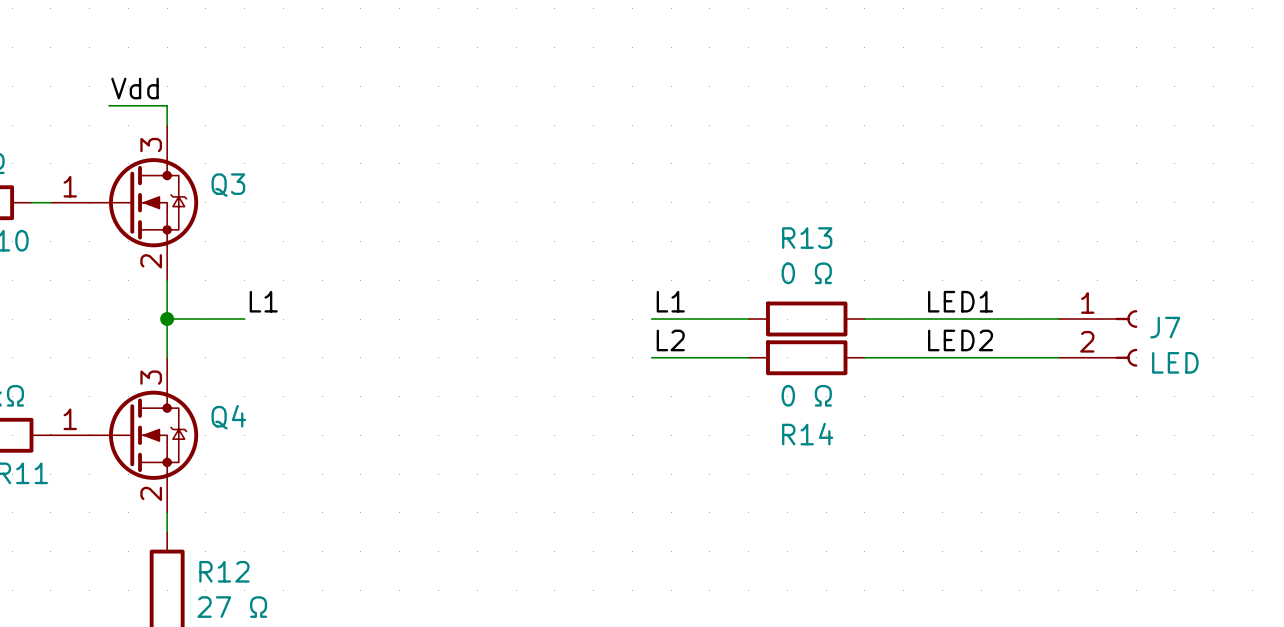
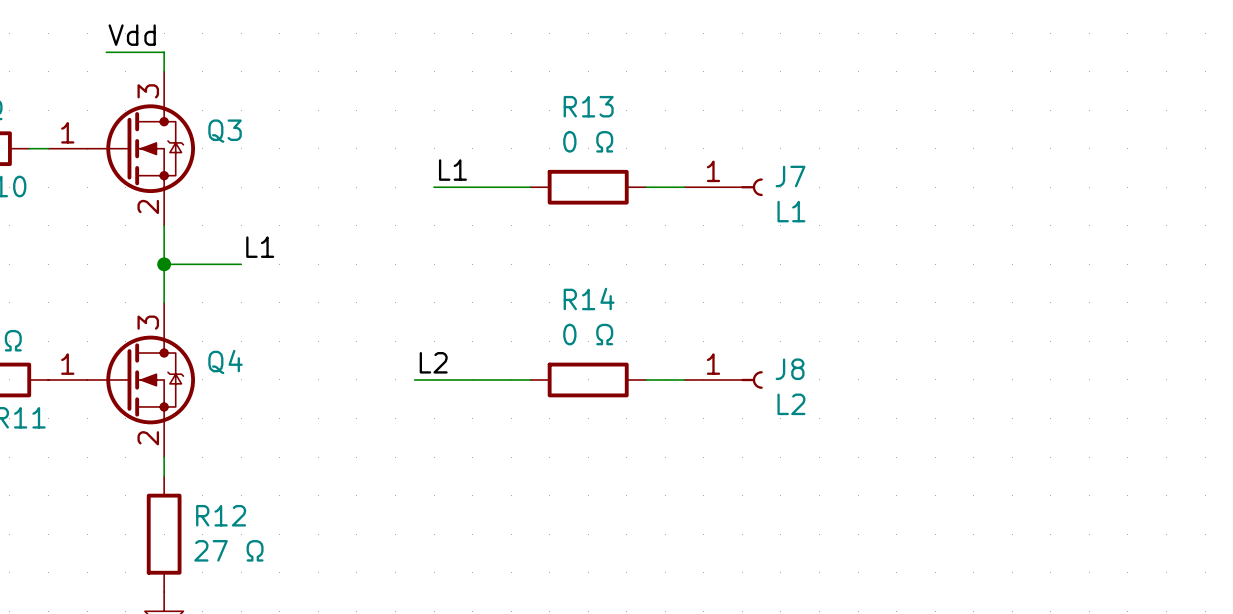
wire: none -> (646, 187) (684, 187)
label position: L1 (670, 301) -> L1 (452, 170)
label: LED1 (960, 301) -> none
J7 symbol: [1058, 310, 1138, 367] -> [684, 178, 763, 197]
wire: (651, 319) (748, 319) -> (434, 187) (530, 187)
R13 position: (806, 319) -> (588, 187)
wire: (864, 319) (1058, 319) -> none
label position: L2 (670, 340) -> L2 (433, 362)
label: LED2 (960, 340) -> none
wire: (651, 357) (748, 357) -> none
R14 position: (806, 357) -> (588, 379)
wire: (864, 357) (1058, 357) -> none
J7 value: LED (1175, 362) -> L1 (791, 211)
R14 value position: 0 Ω (806, 395) -> 0 Ω (588, 334)
R14 name position: R14 (807, 434) -> R14 (589, 299)
wire: none -> (414, 379) (530, 379)
wire: none -> (646, 379) (684, 379)
J8: none -> L2 (723, 379)

